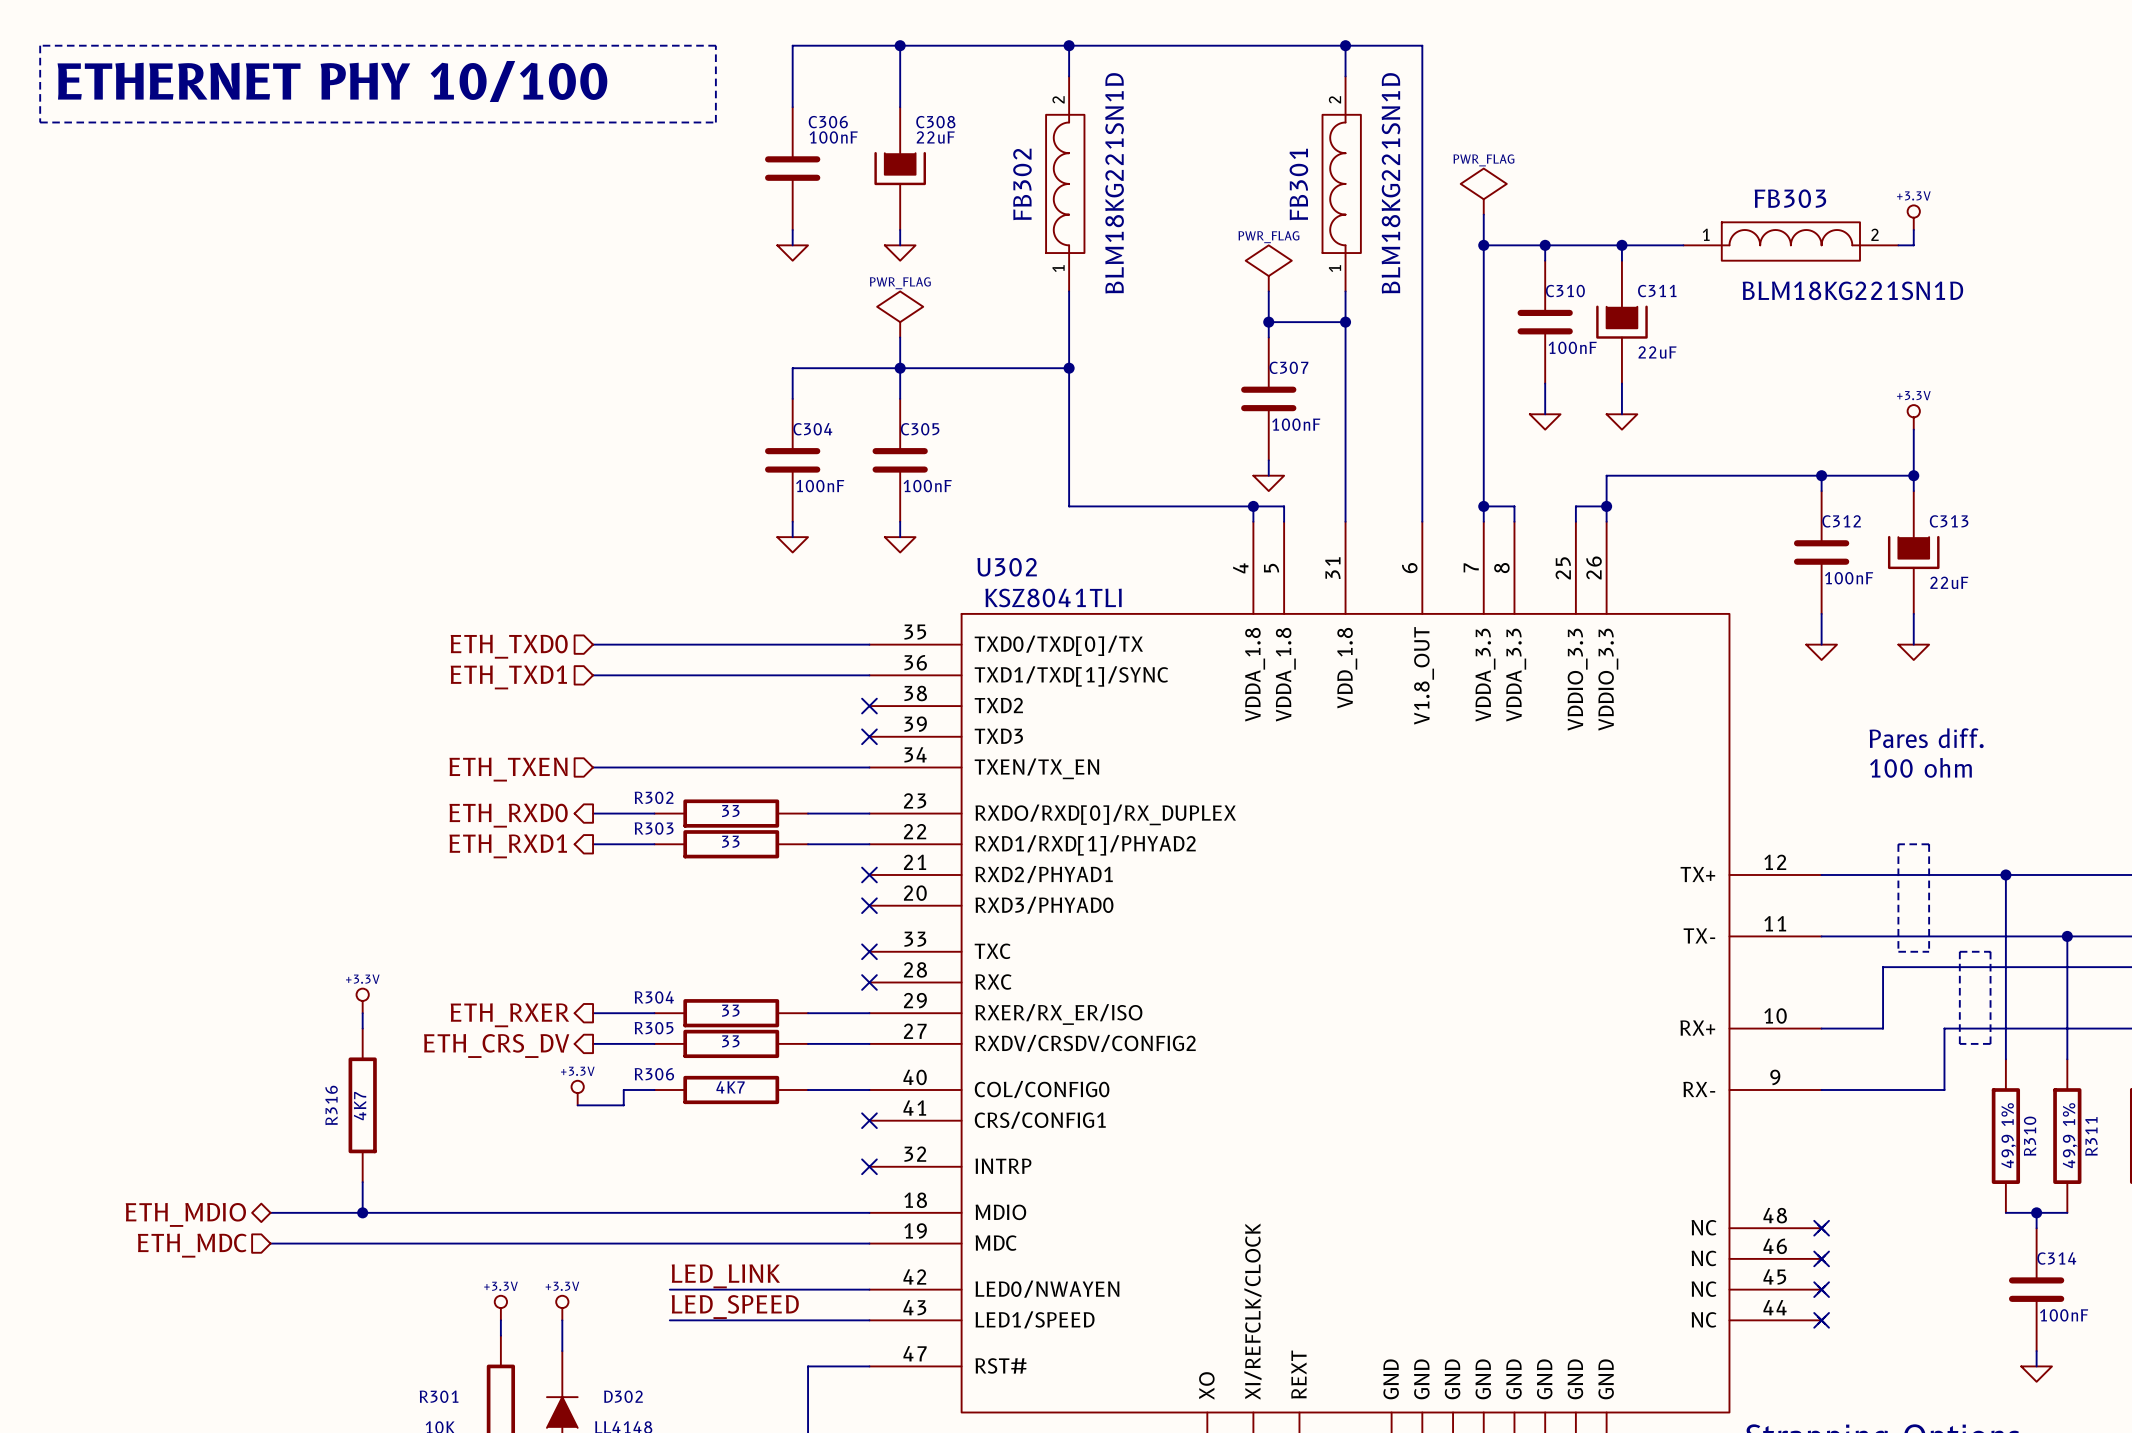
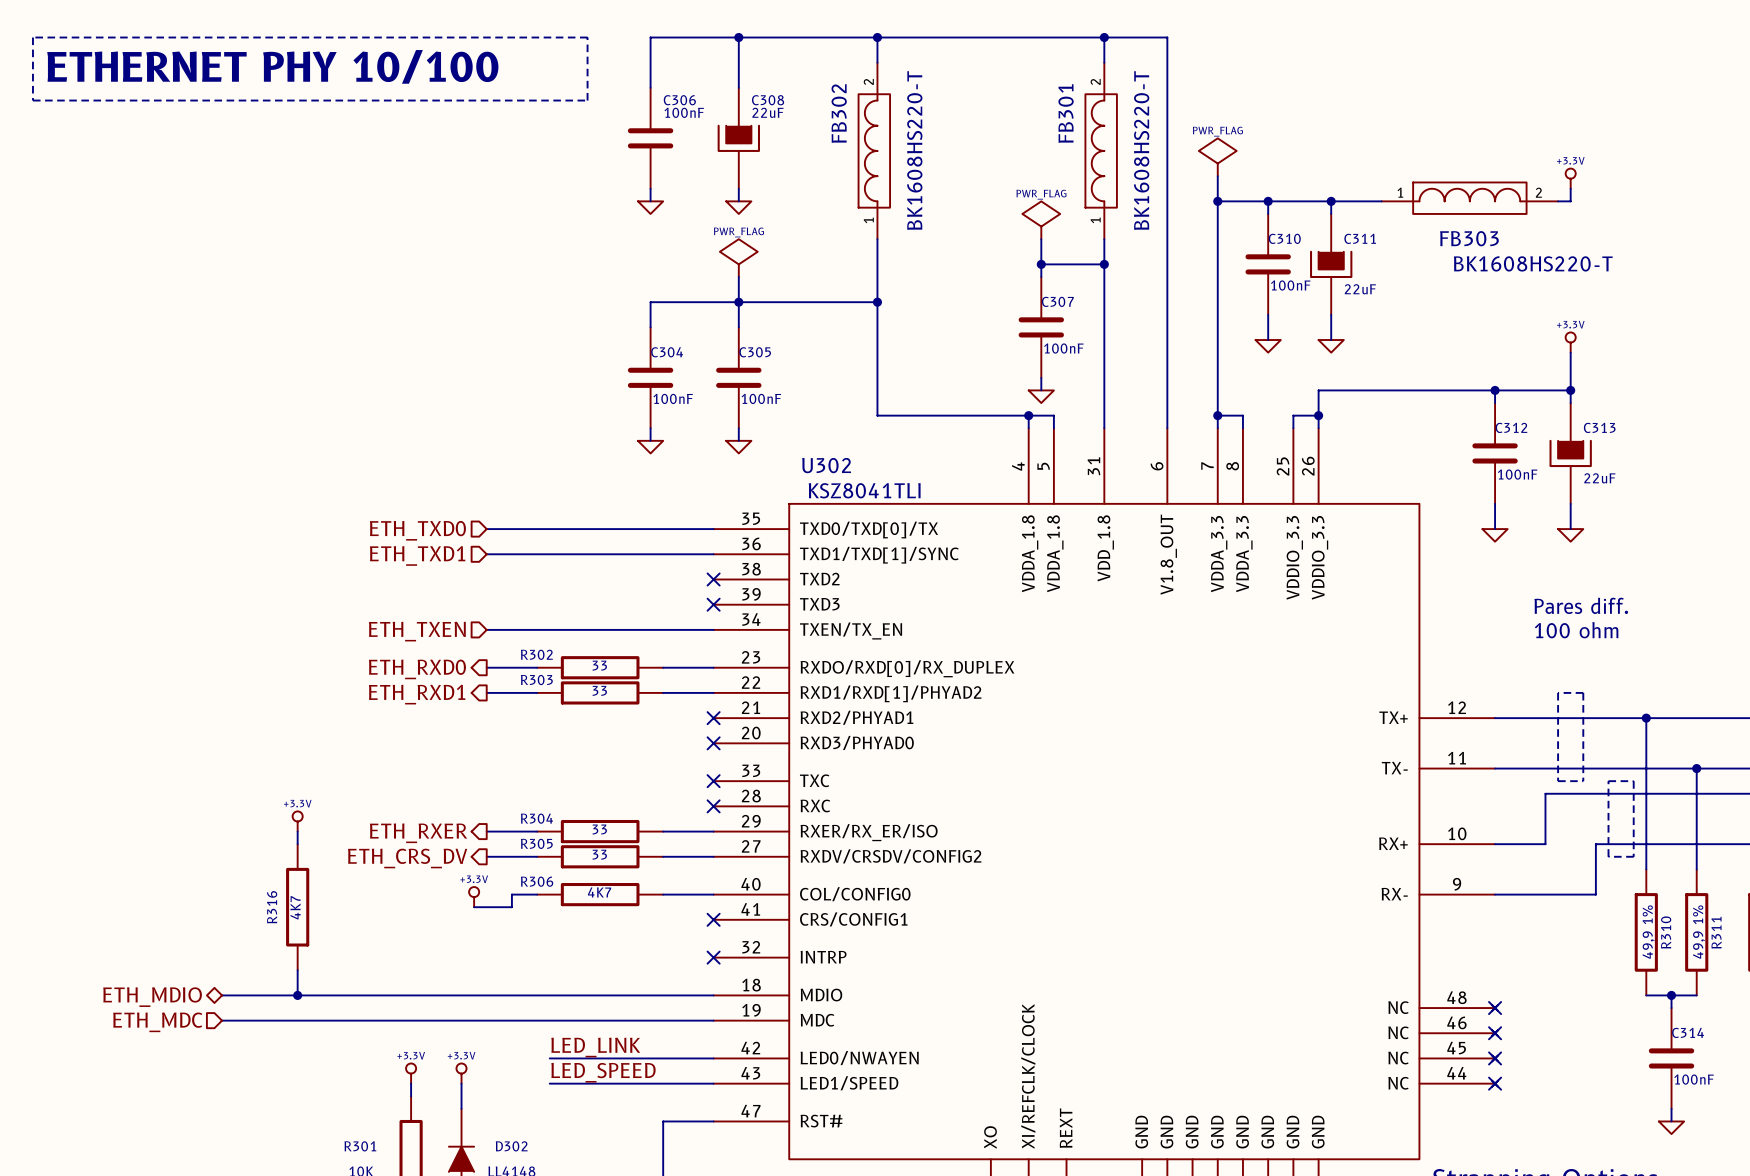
FB302 value: BLM18KG221SN1D (1114, 183) -> BK1608HS220-T (914, 150)
FB301 value: BLM18KG221SN1D (1391, 183) -> BK1608HS220-T (1141, 150)
FB302 name position: FB302 (1022, 184) -> FB302 (839, 113)
FB301 name position: FB301 (1298, 184) -> FB301 (1066, 113)
FB303 name position: FB303 (1790, 198) -> FB303 (1469, 238)
FB303 value: BLM18KG221SN1D (1852, 290) -> BK1608HS220-T (1533, 263)

